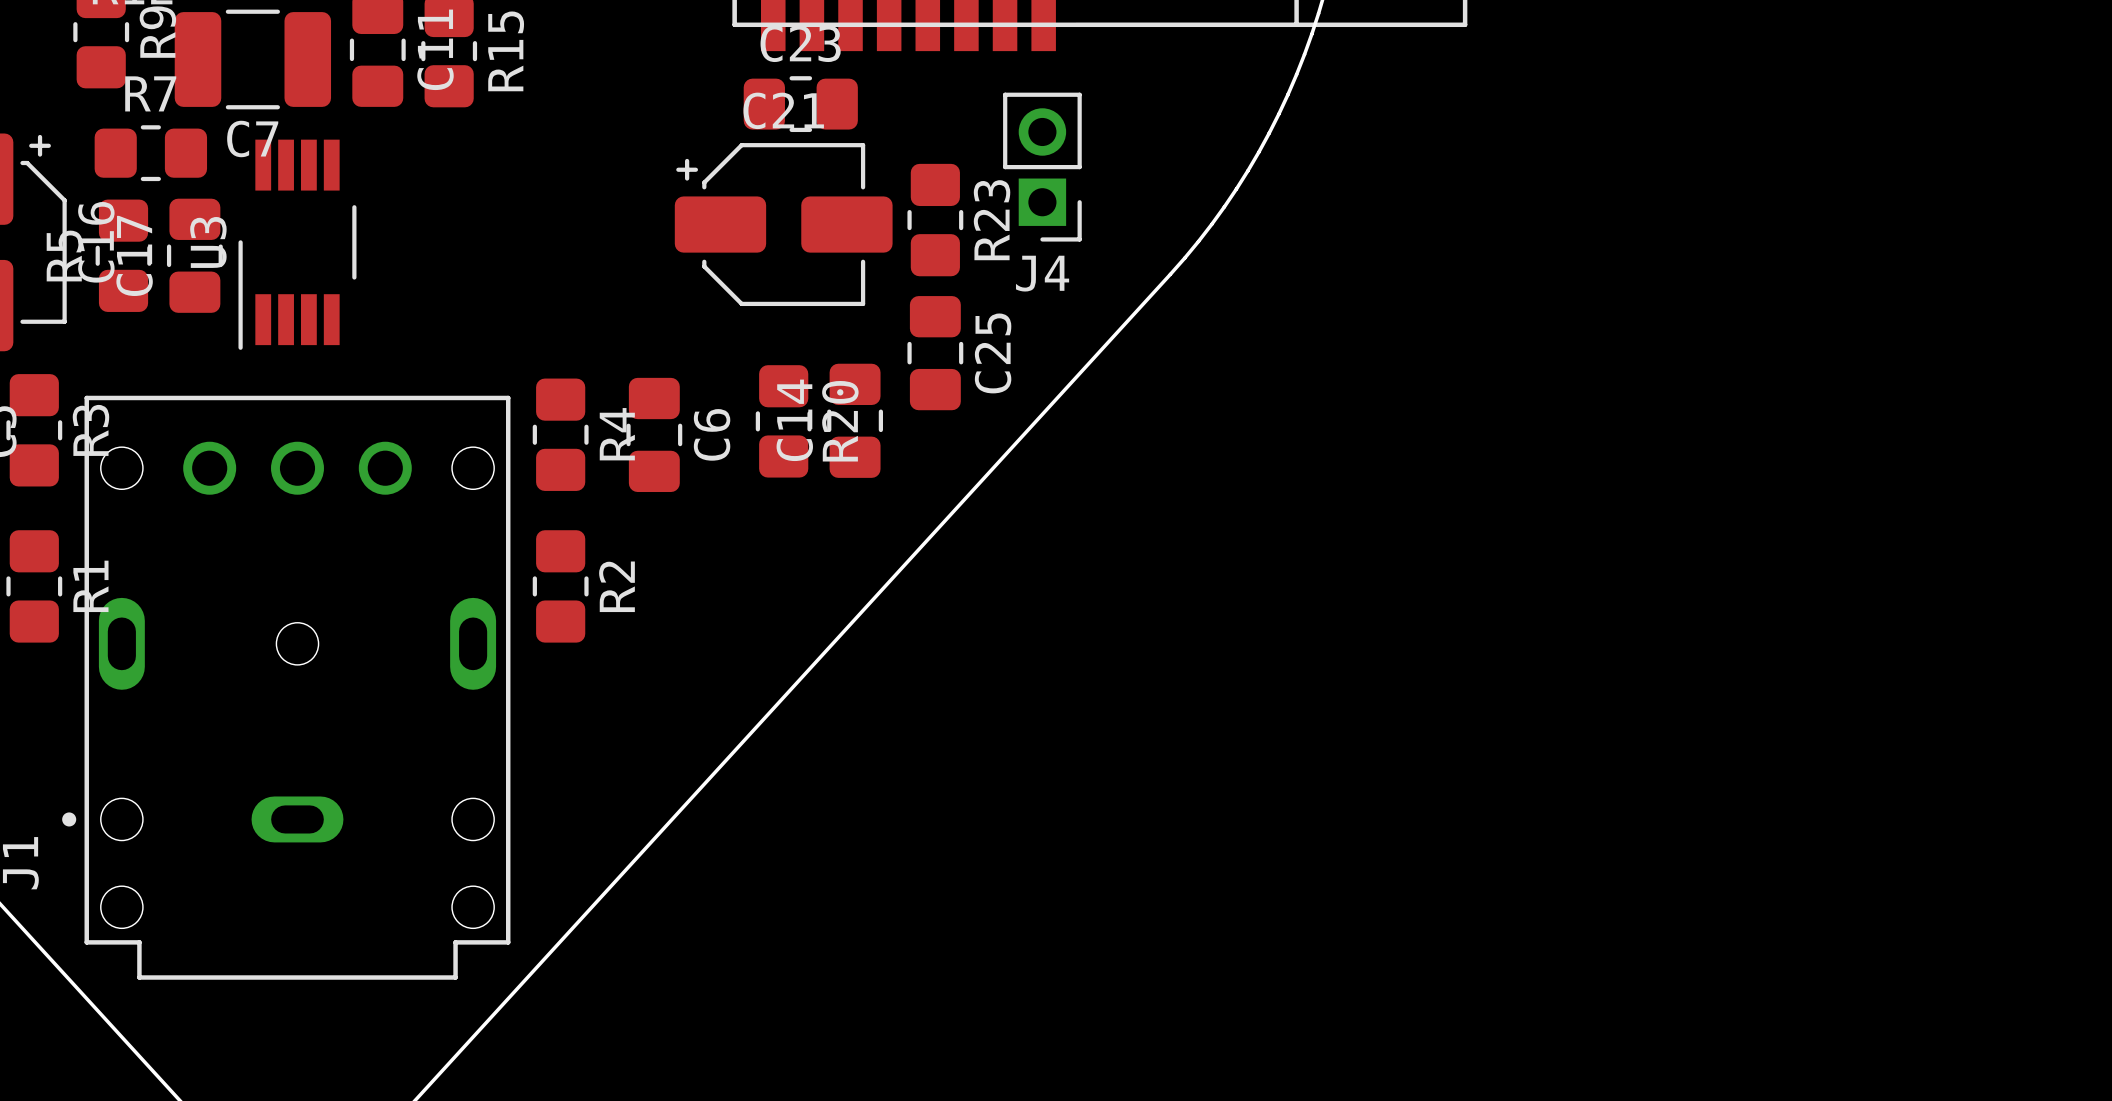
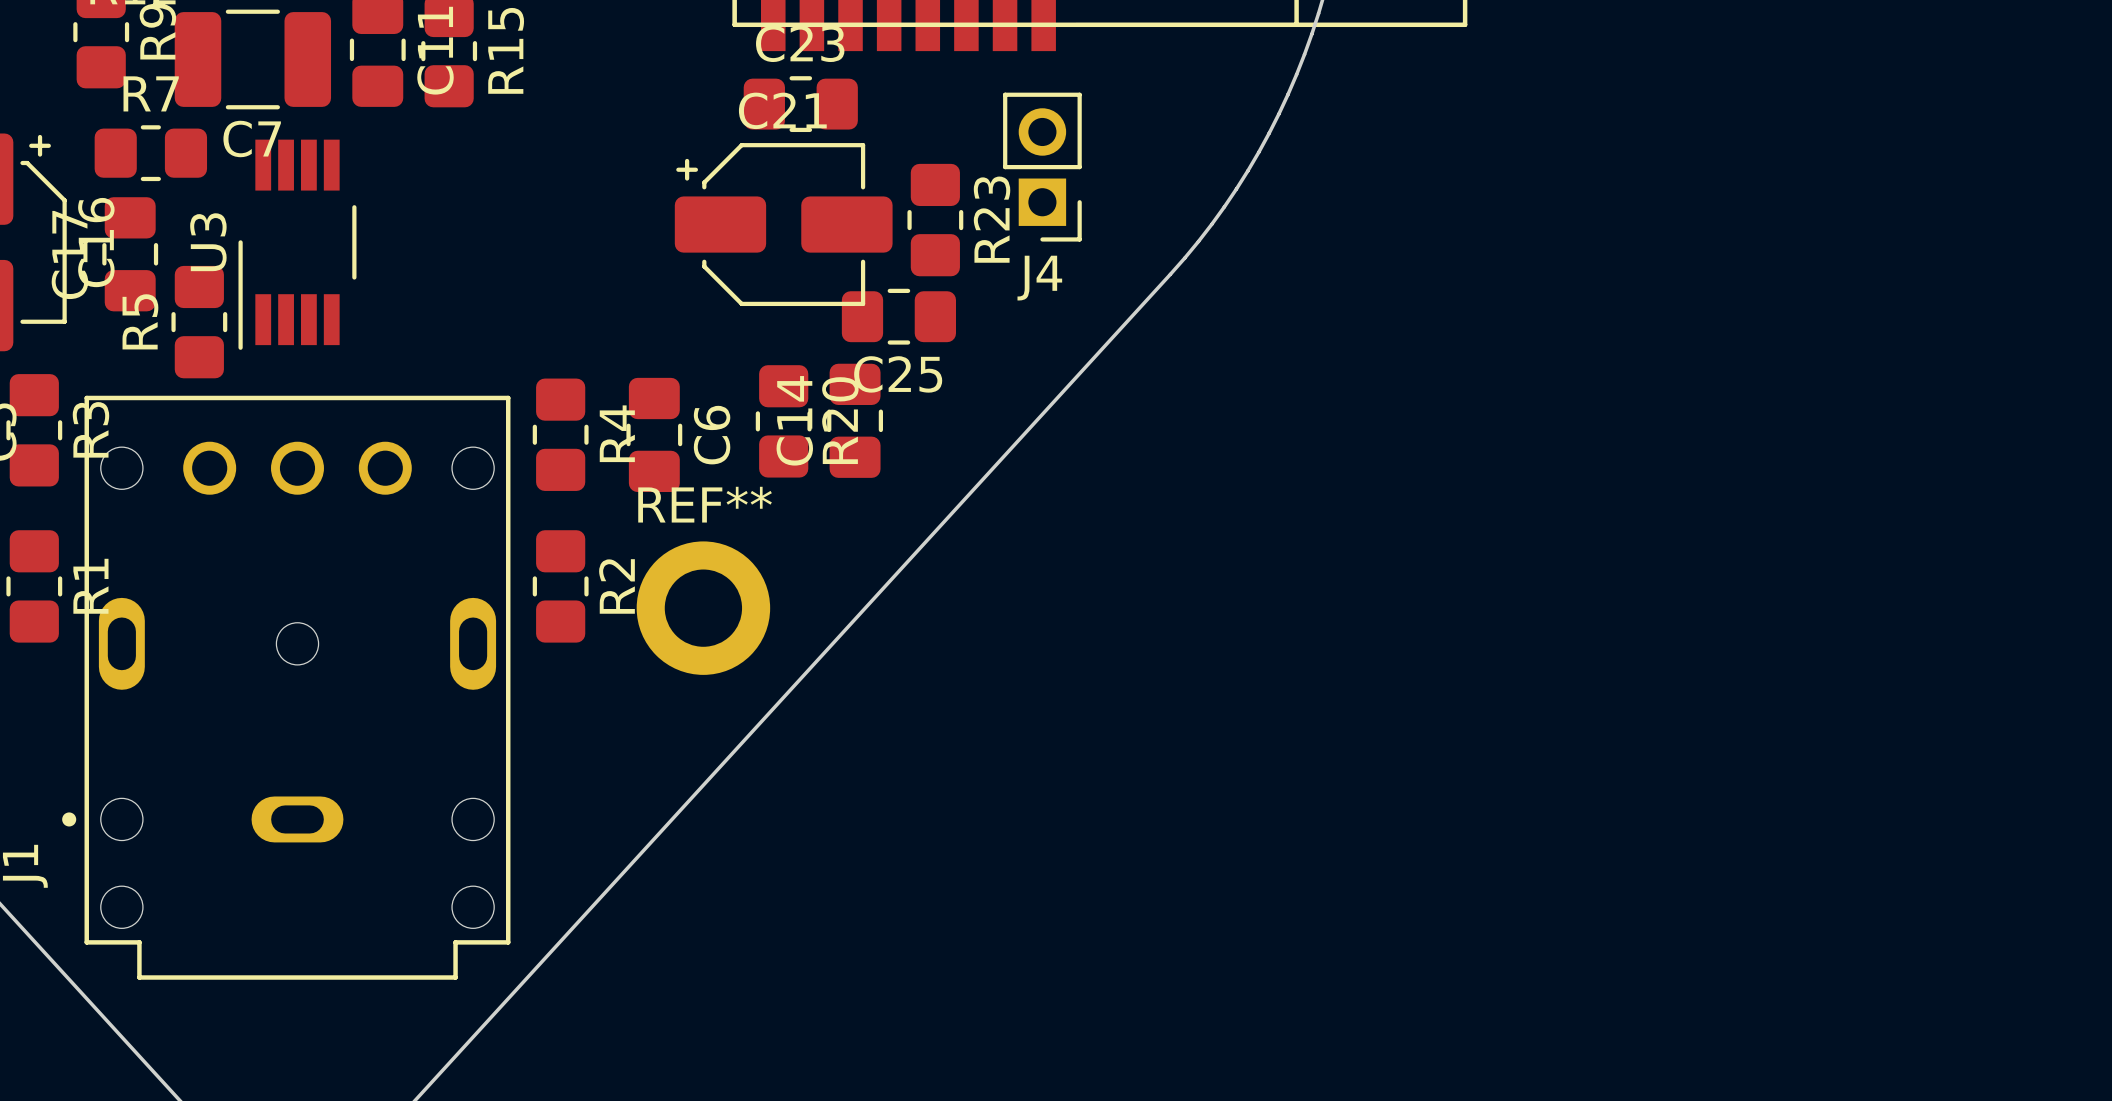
R5 position: (123, 255) -> (199, 322)
C17 position: (194, 255) -> (130, 254)
C25 rotation: 0° (935, 353) -> 90° clockwise (898, 316)
REF**: none -> (703, 608)

